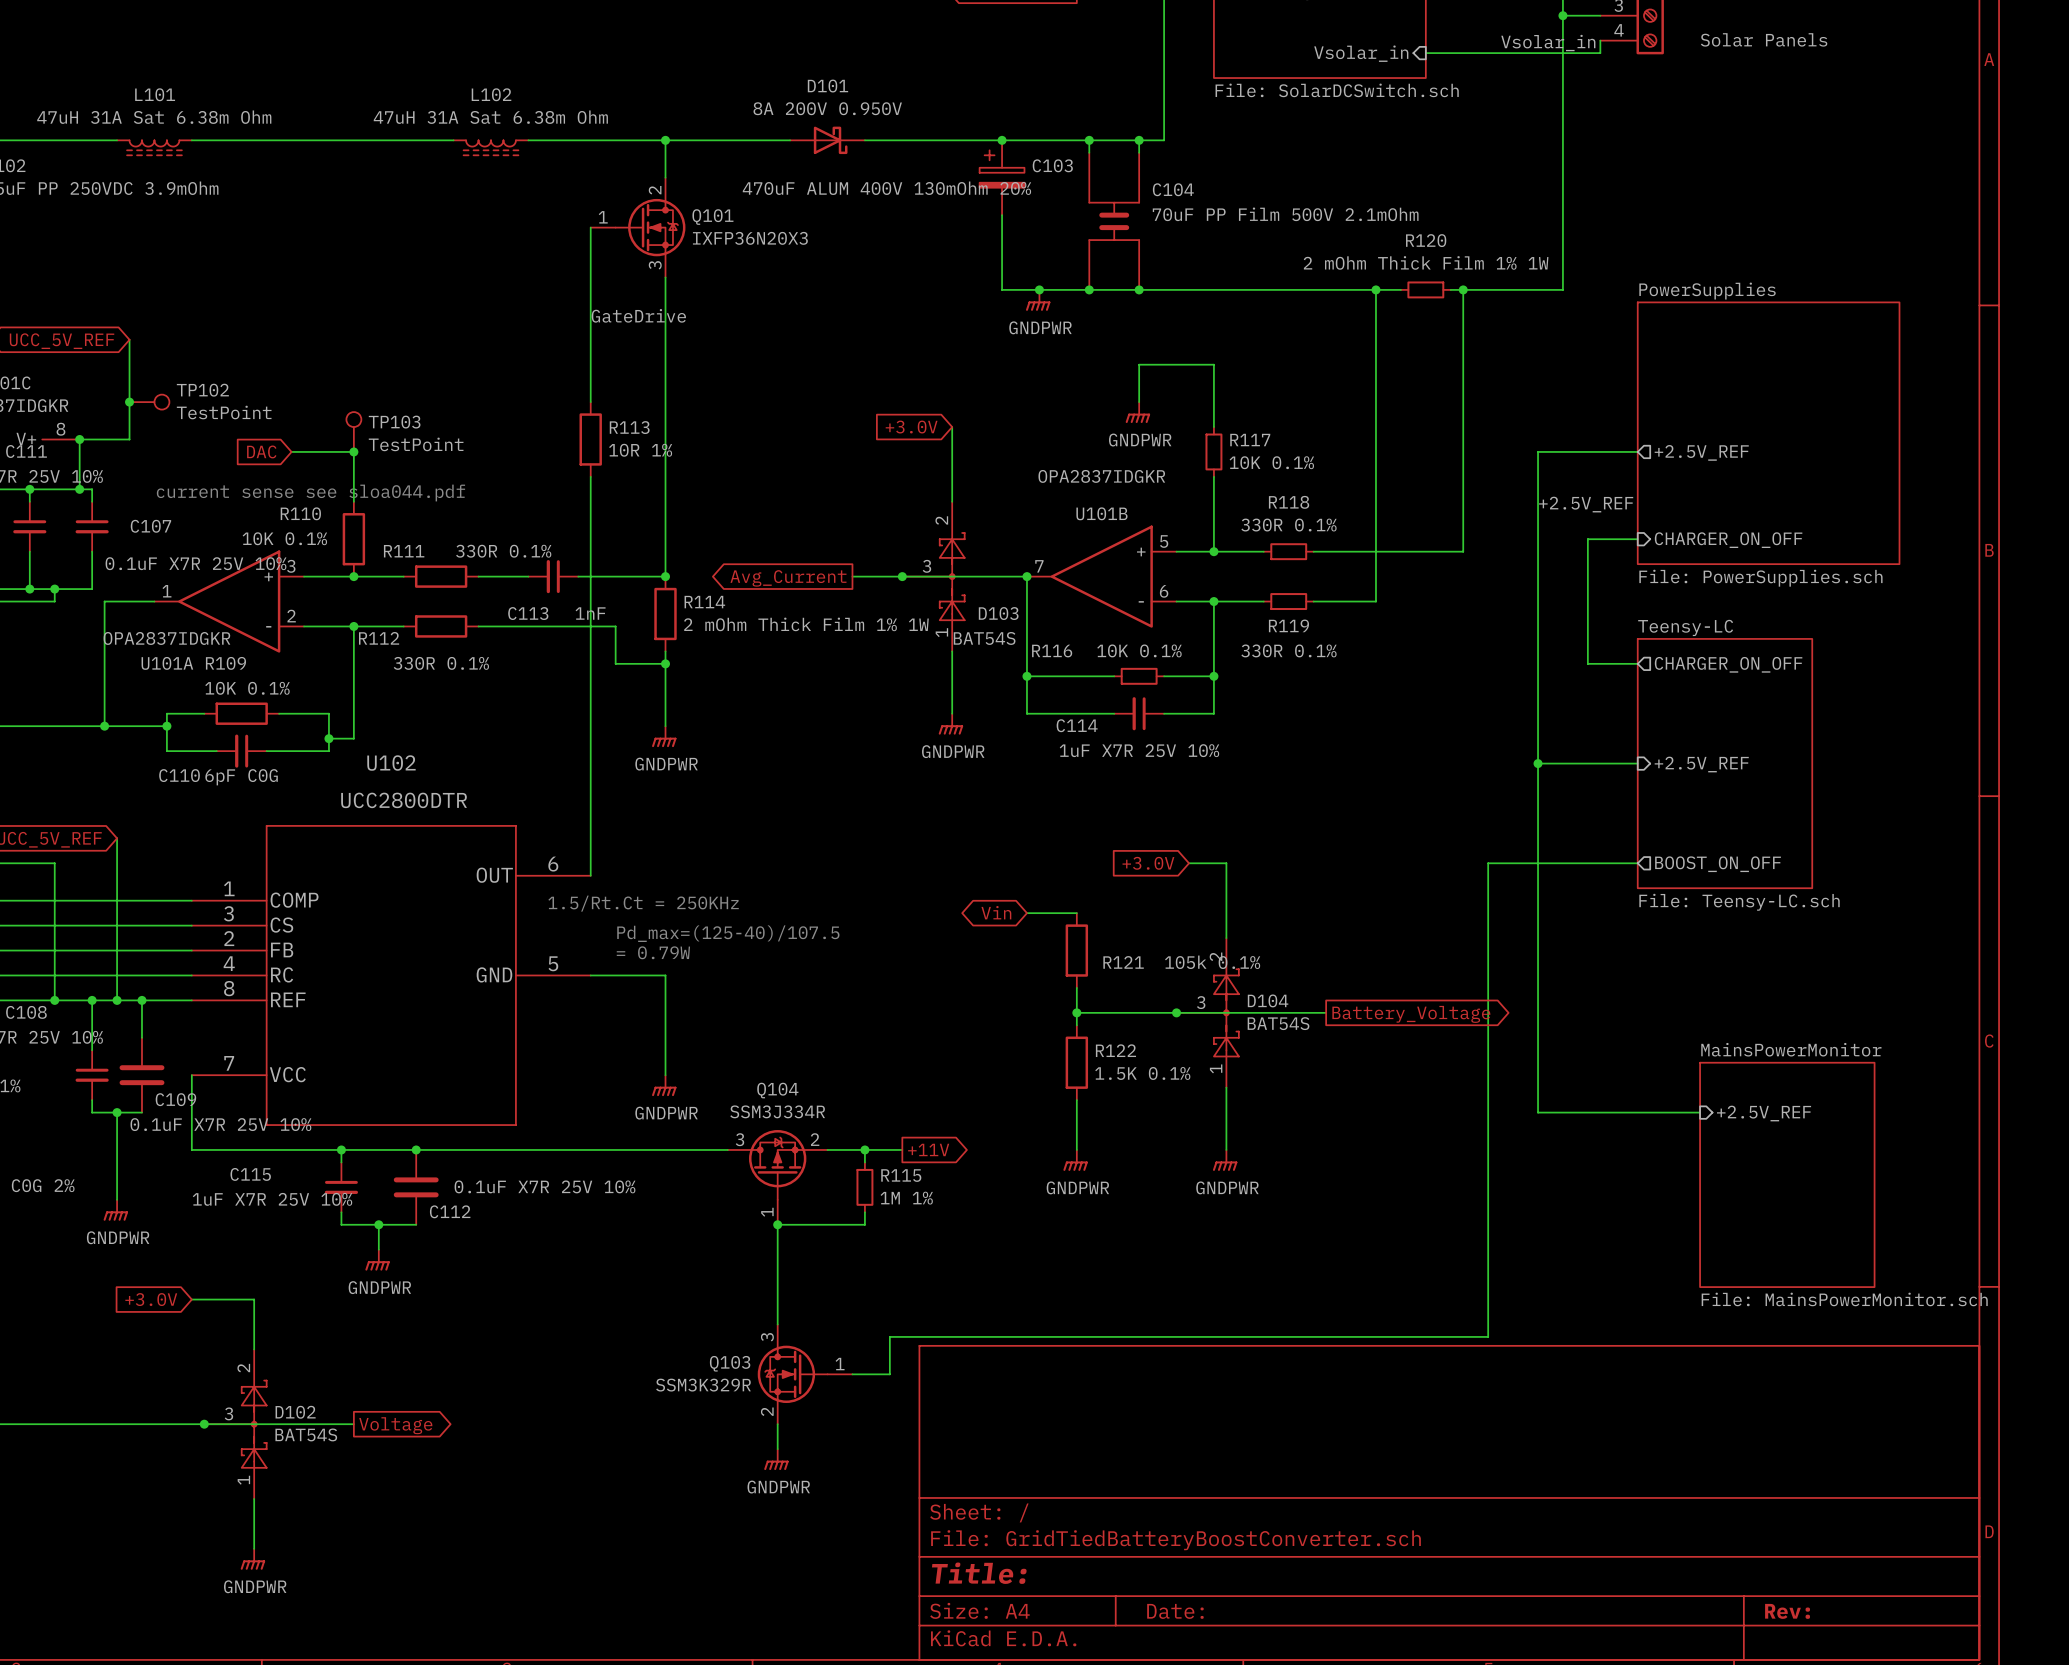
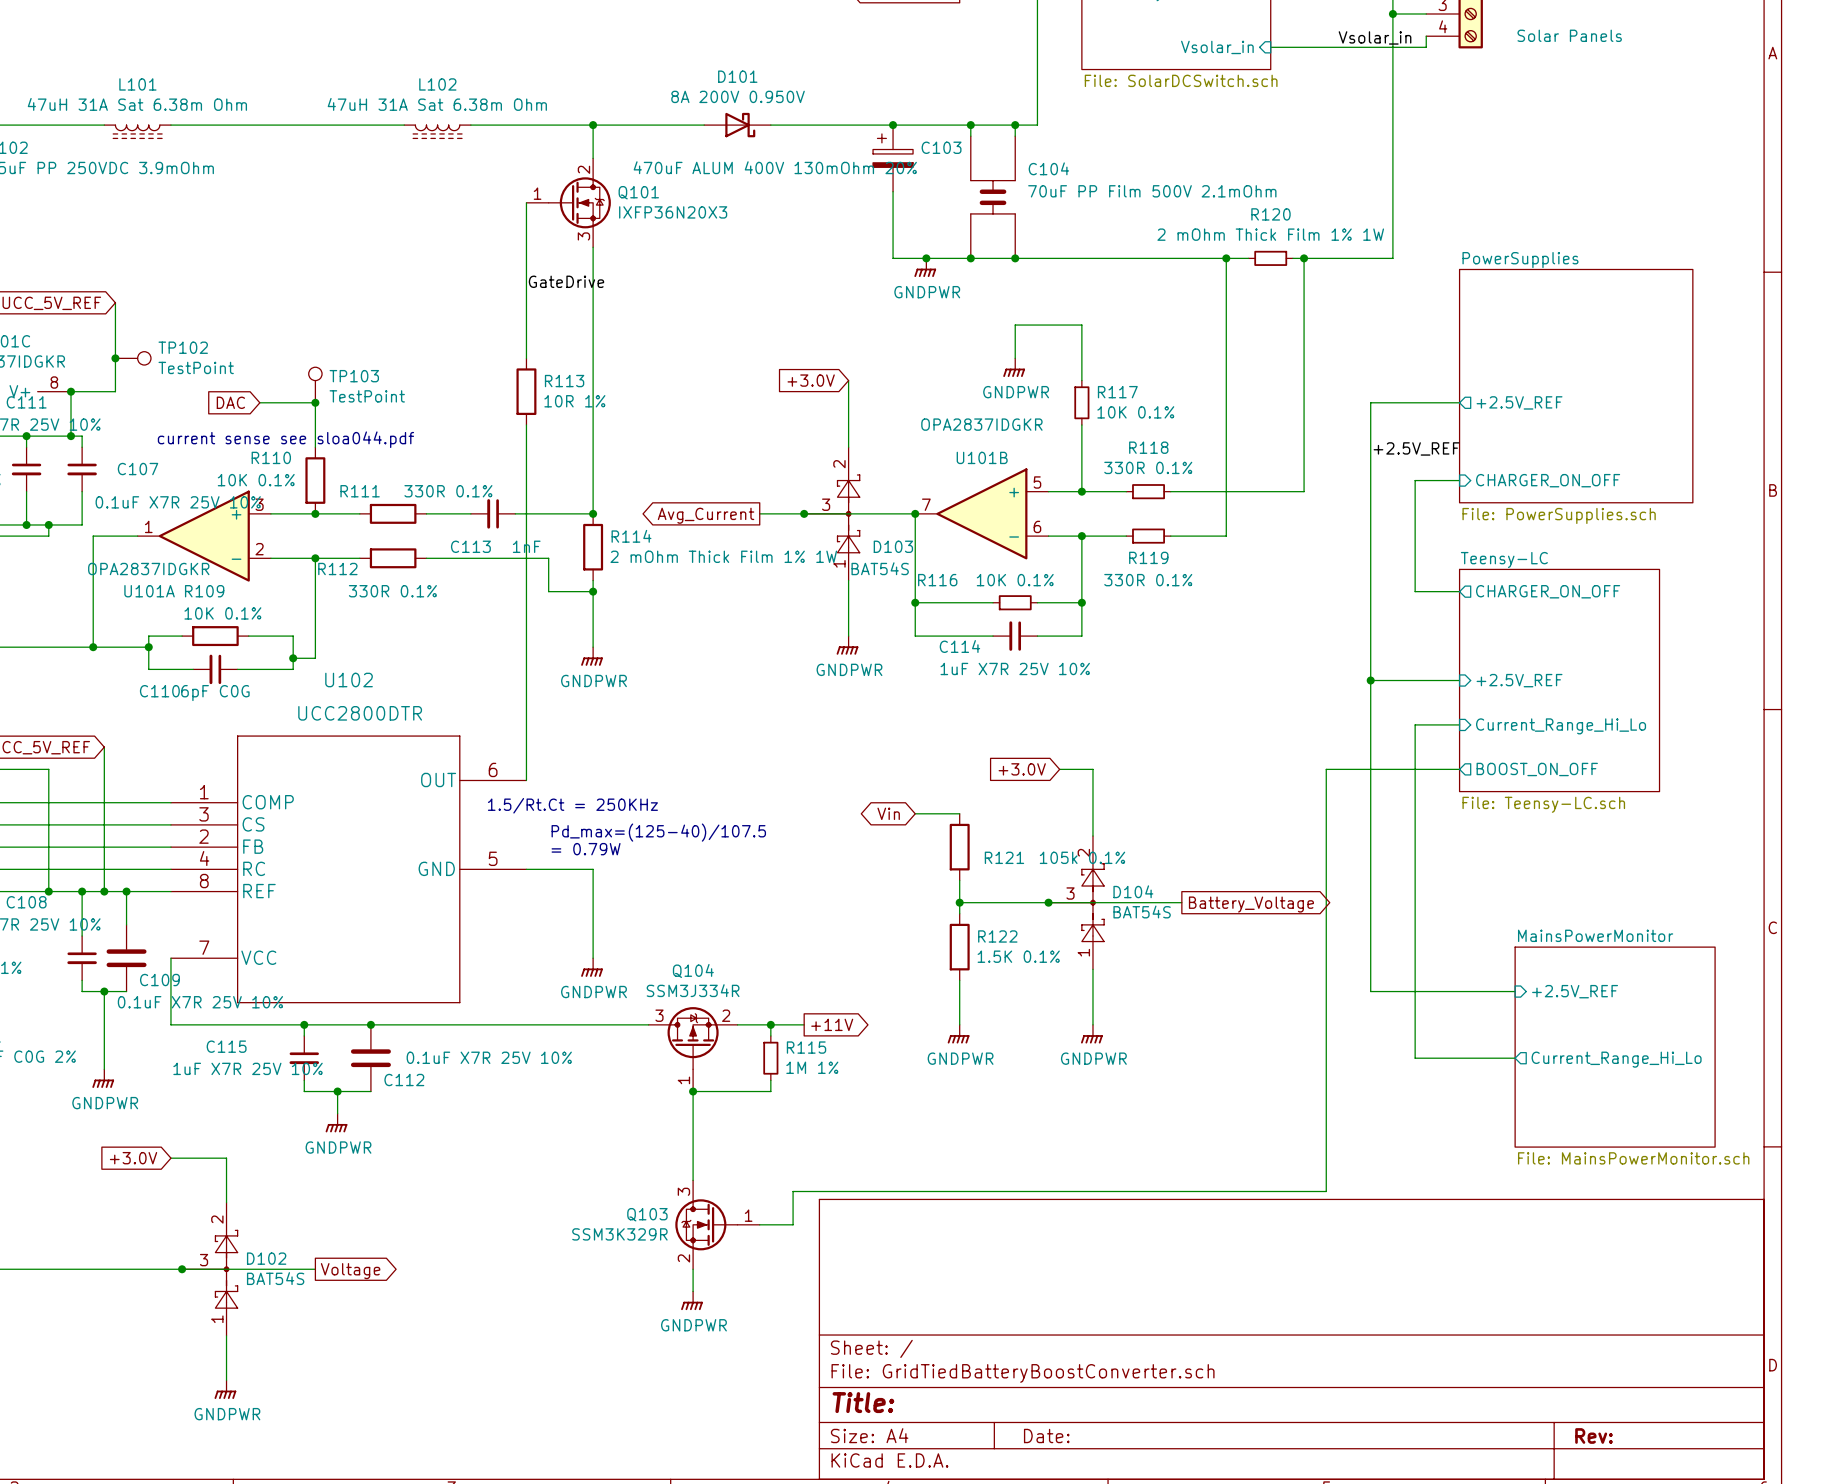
sheet Teensy-LC: File: Teensy-LC.sch (1724, 763) -> none
sheet Teensy-LC: none -> File: Teensy-LC.sch (1559, 680)
wire: none -> (1459, 724) (1415, 724) (1415, 1058) (1515, 1058)
sheet pin: none -> Current_Range_Hi_Lo (1561, 726)
sheet MainsPowerMonitor: File: MainsPowerMonitor.sch (1787, 1174) -> none
sheet MainsPowerMonitor: none -> File: MainsPowerMonitor.sch (1615, 1047)
sheet pin: none -> Current_Range_Hi_Lo (1616, 1059)

